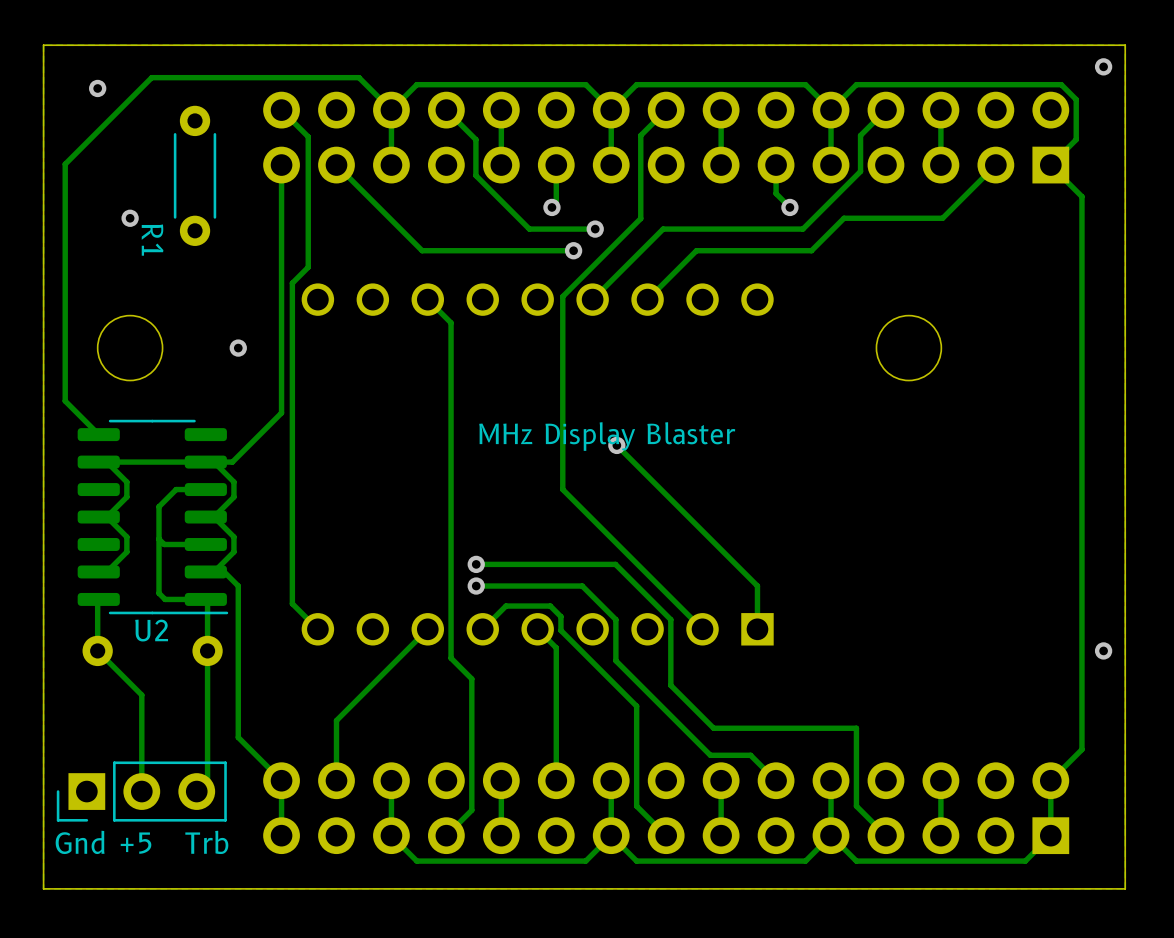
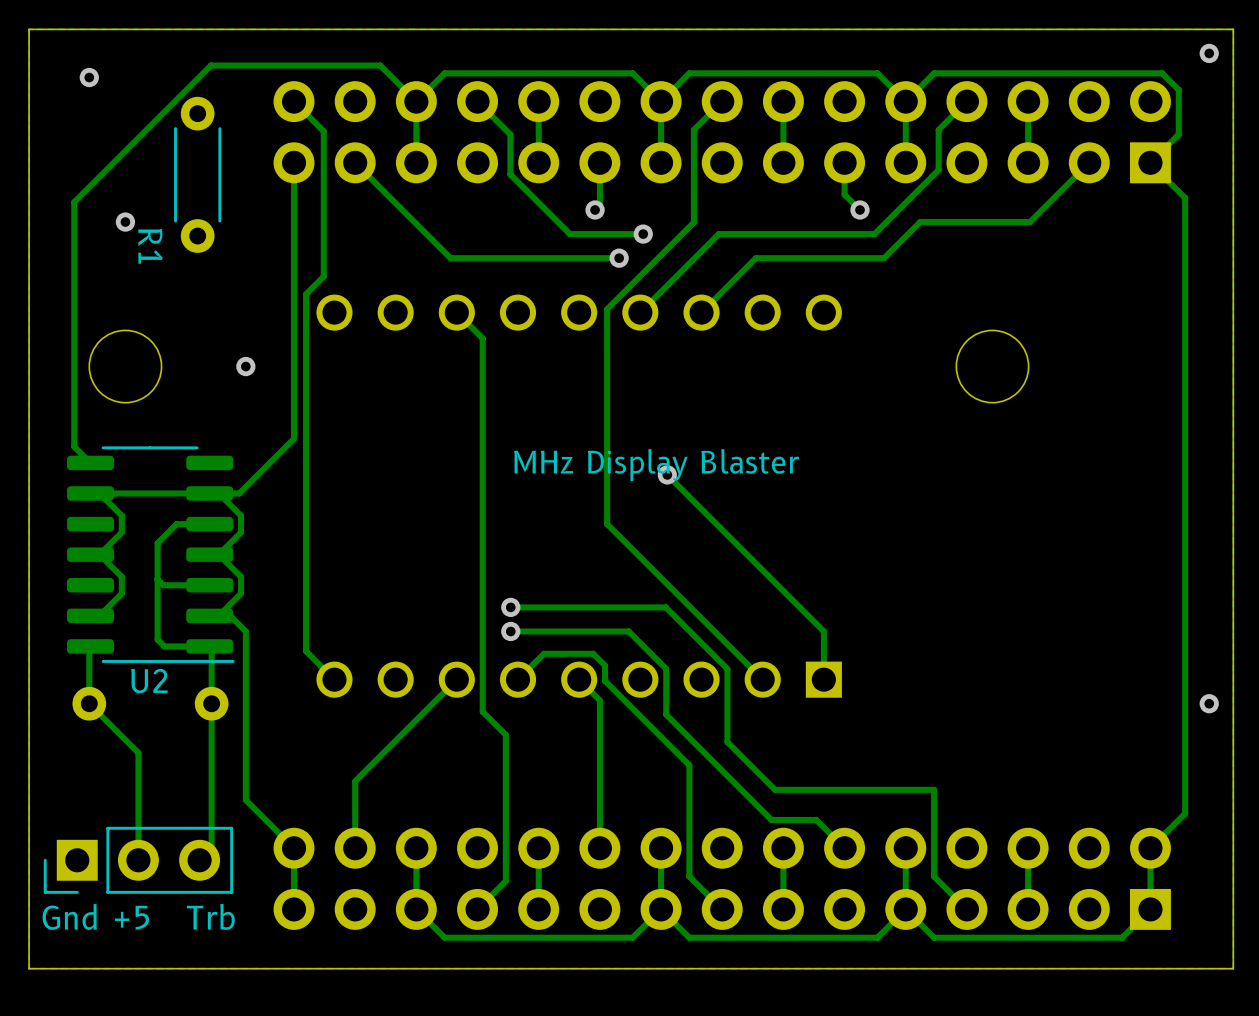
track: (206, 77) (151, 77) (65, 164) (65, 401) (84, 420) -> (210, 65) (74, 202) (74, 446)

